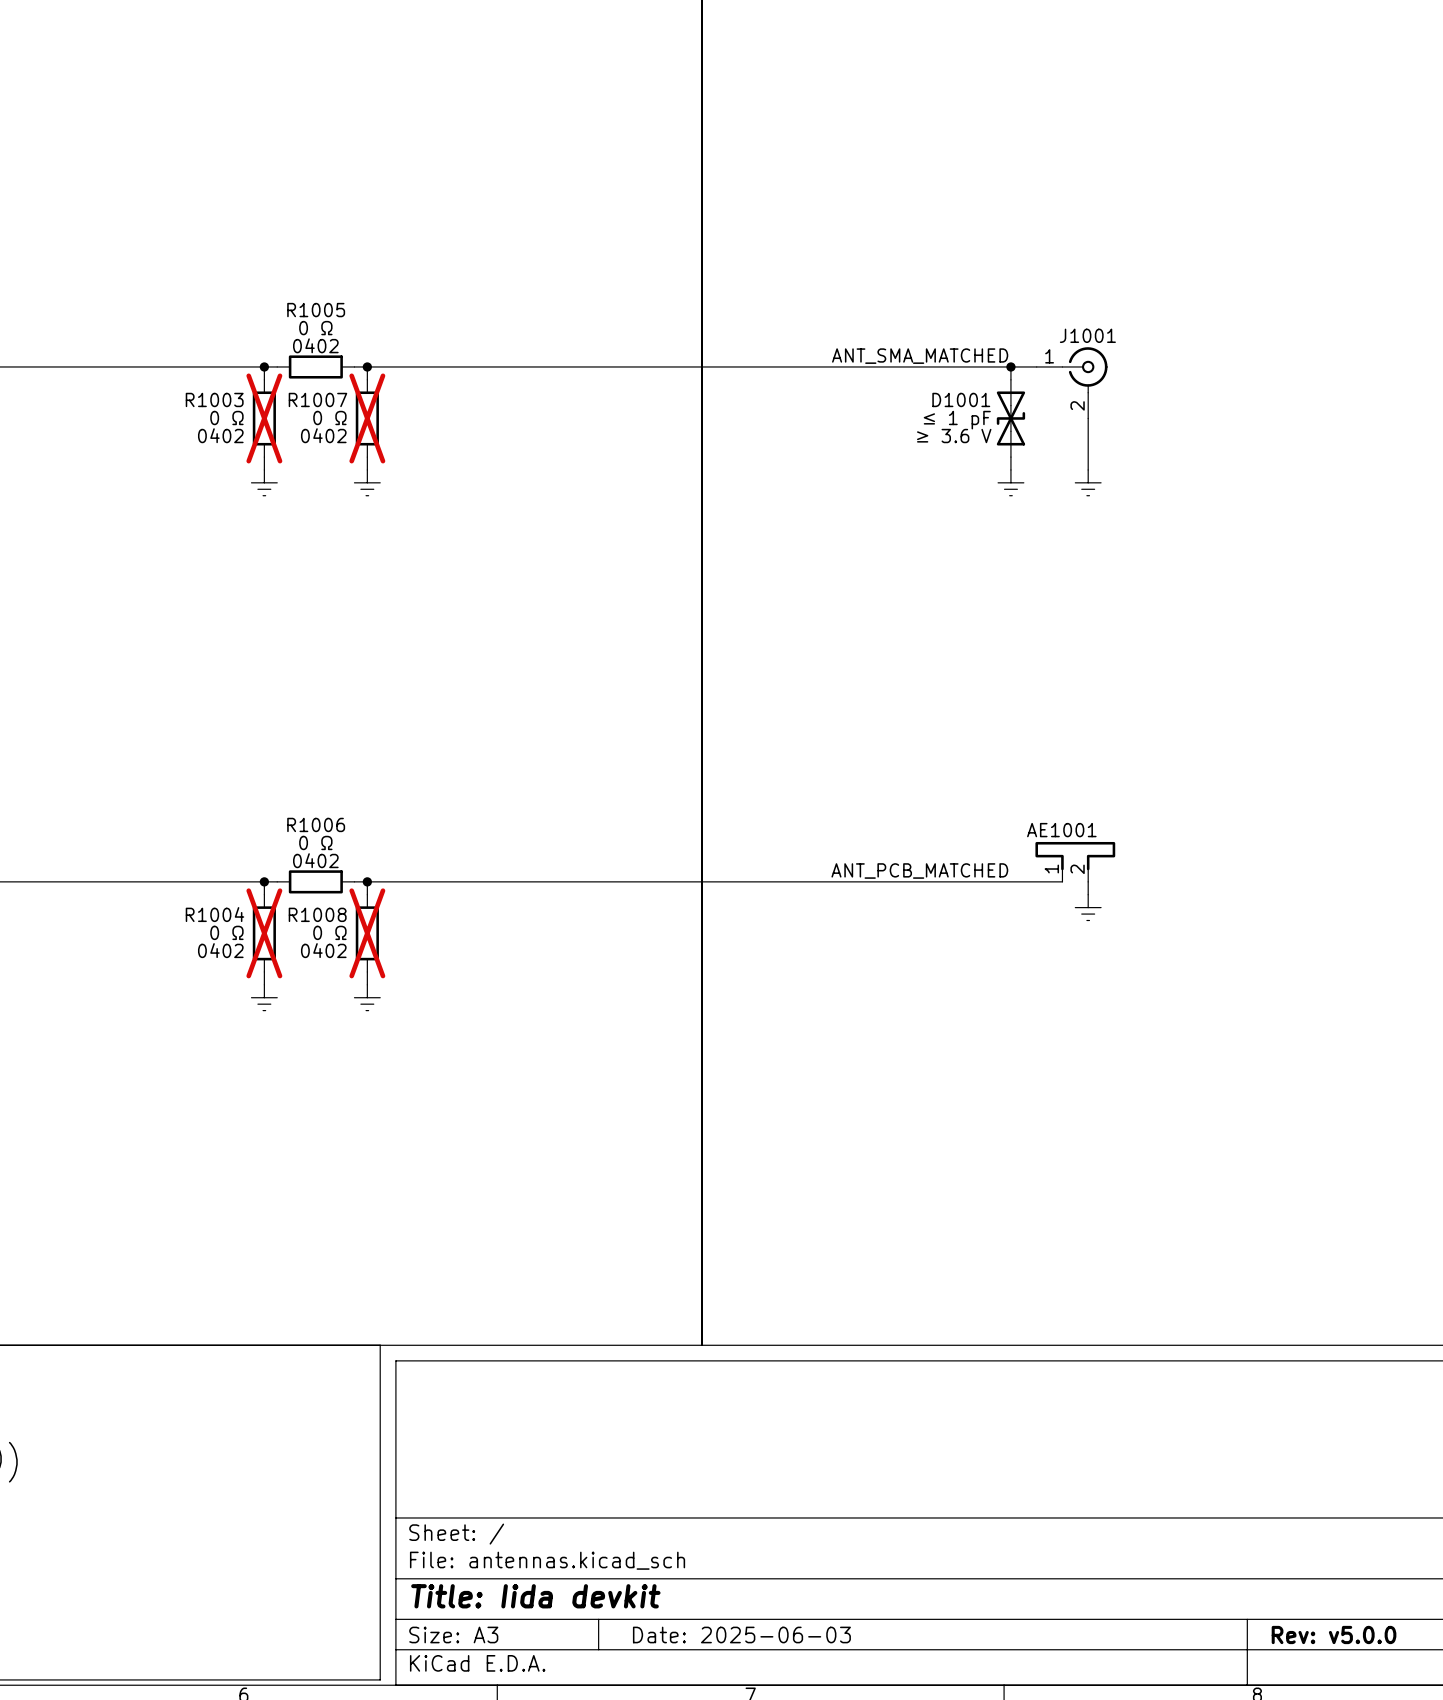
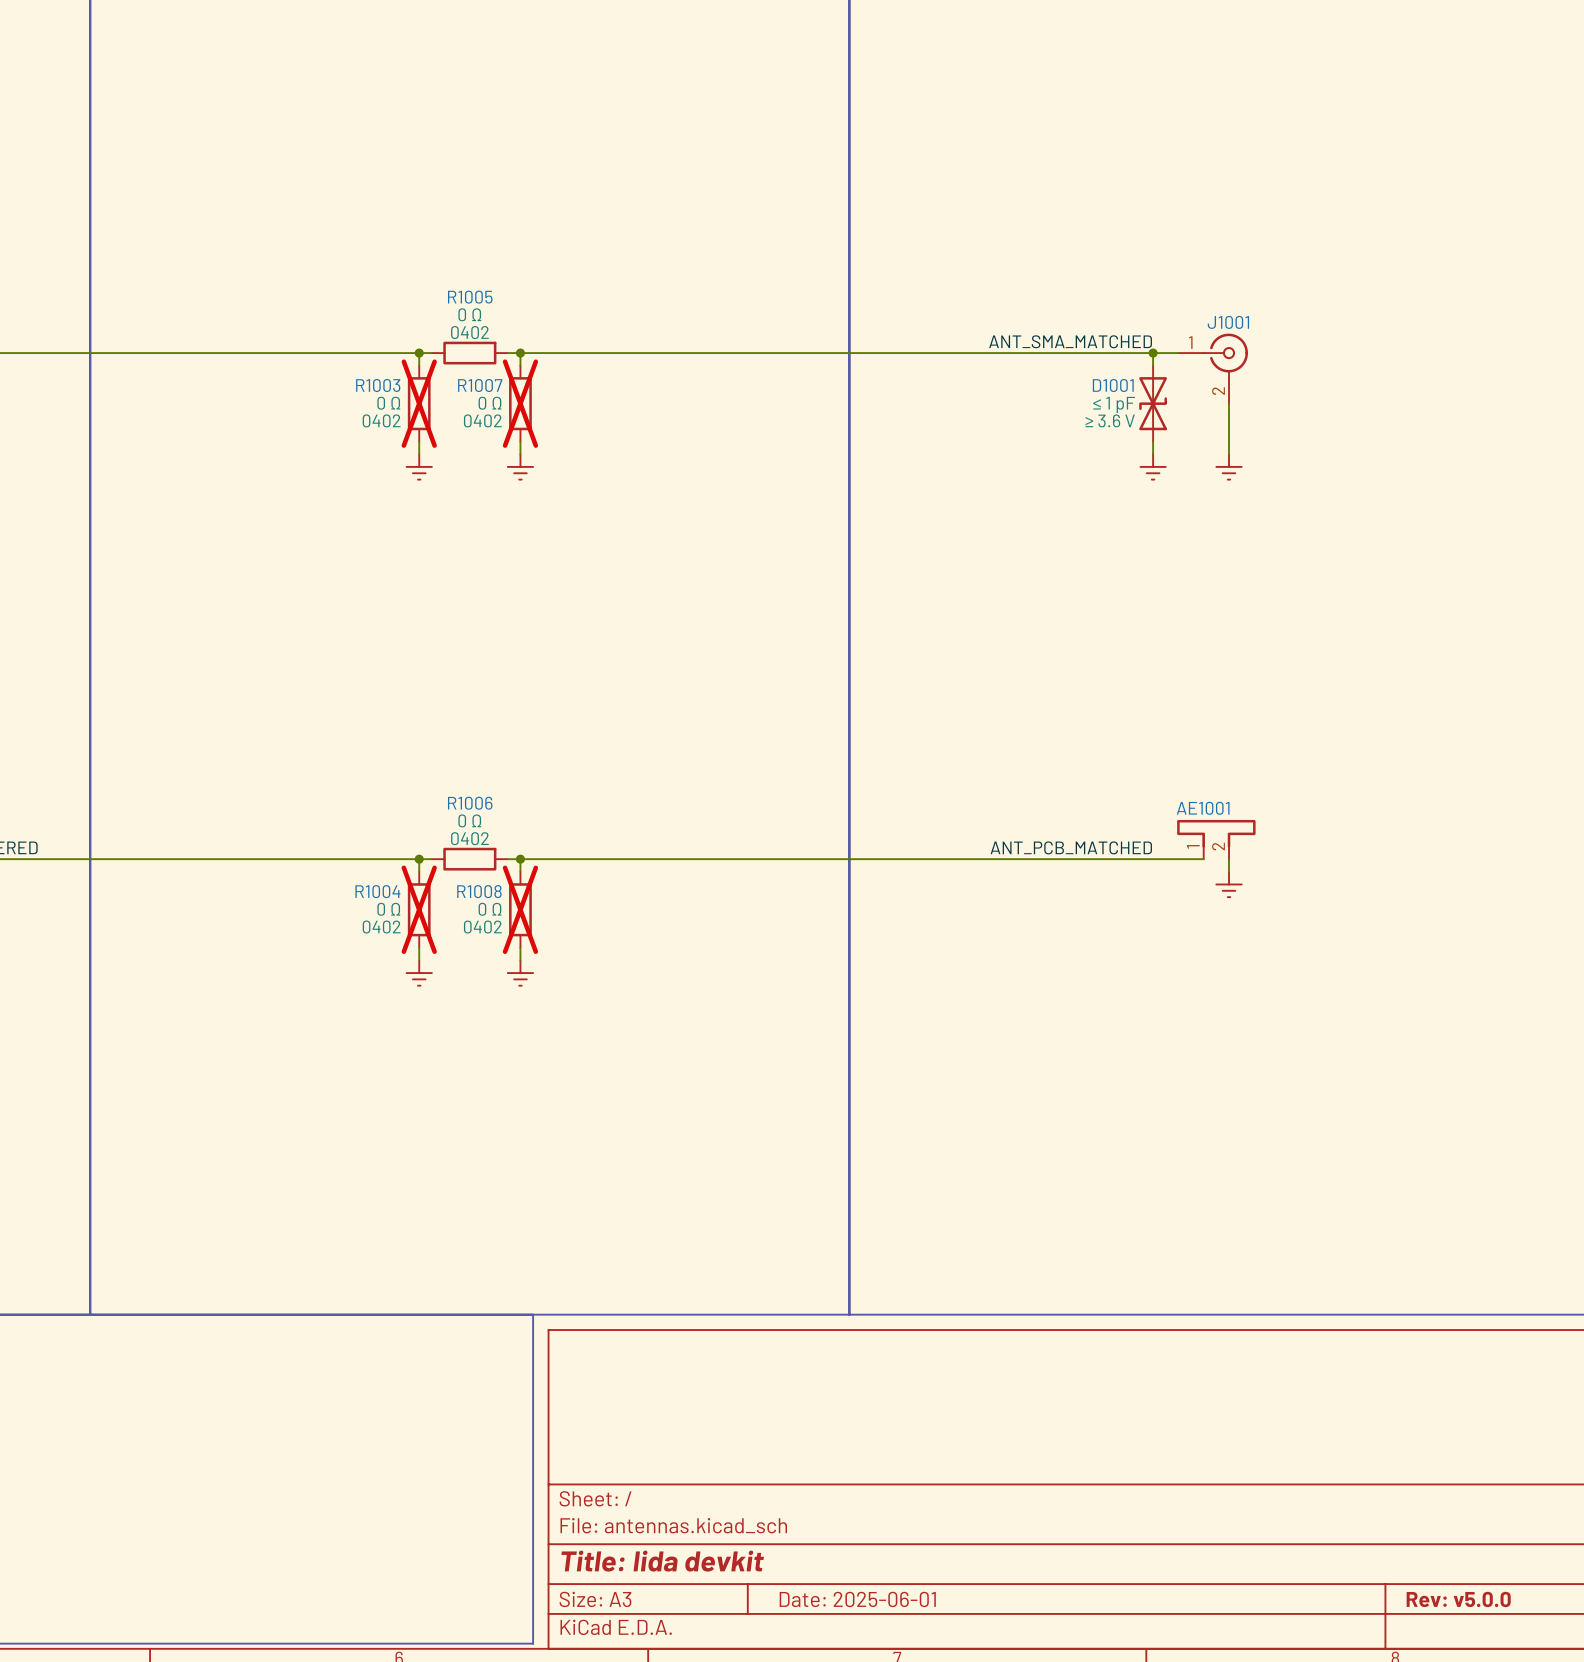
title block: Date: 2025-06-03 (741, 1634) -> Date: 2025-06-01 (857, 1599)

